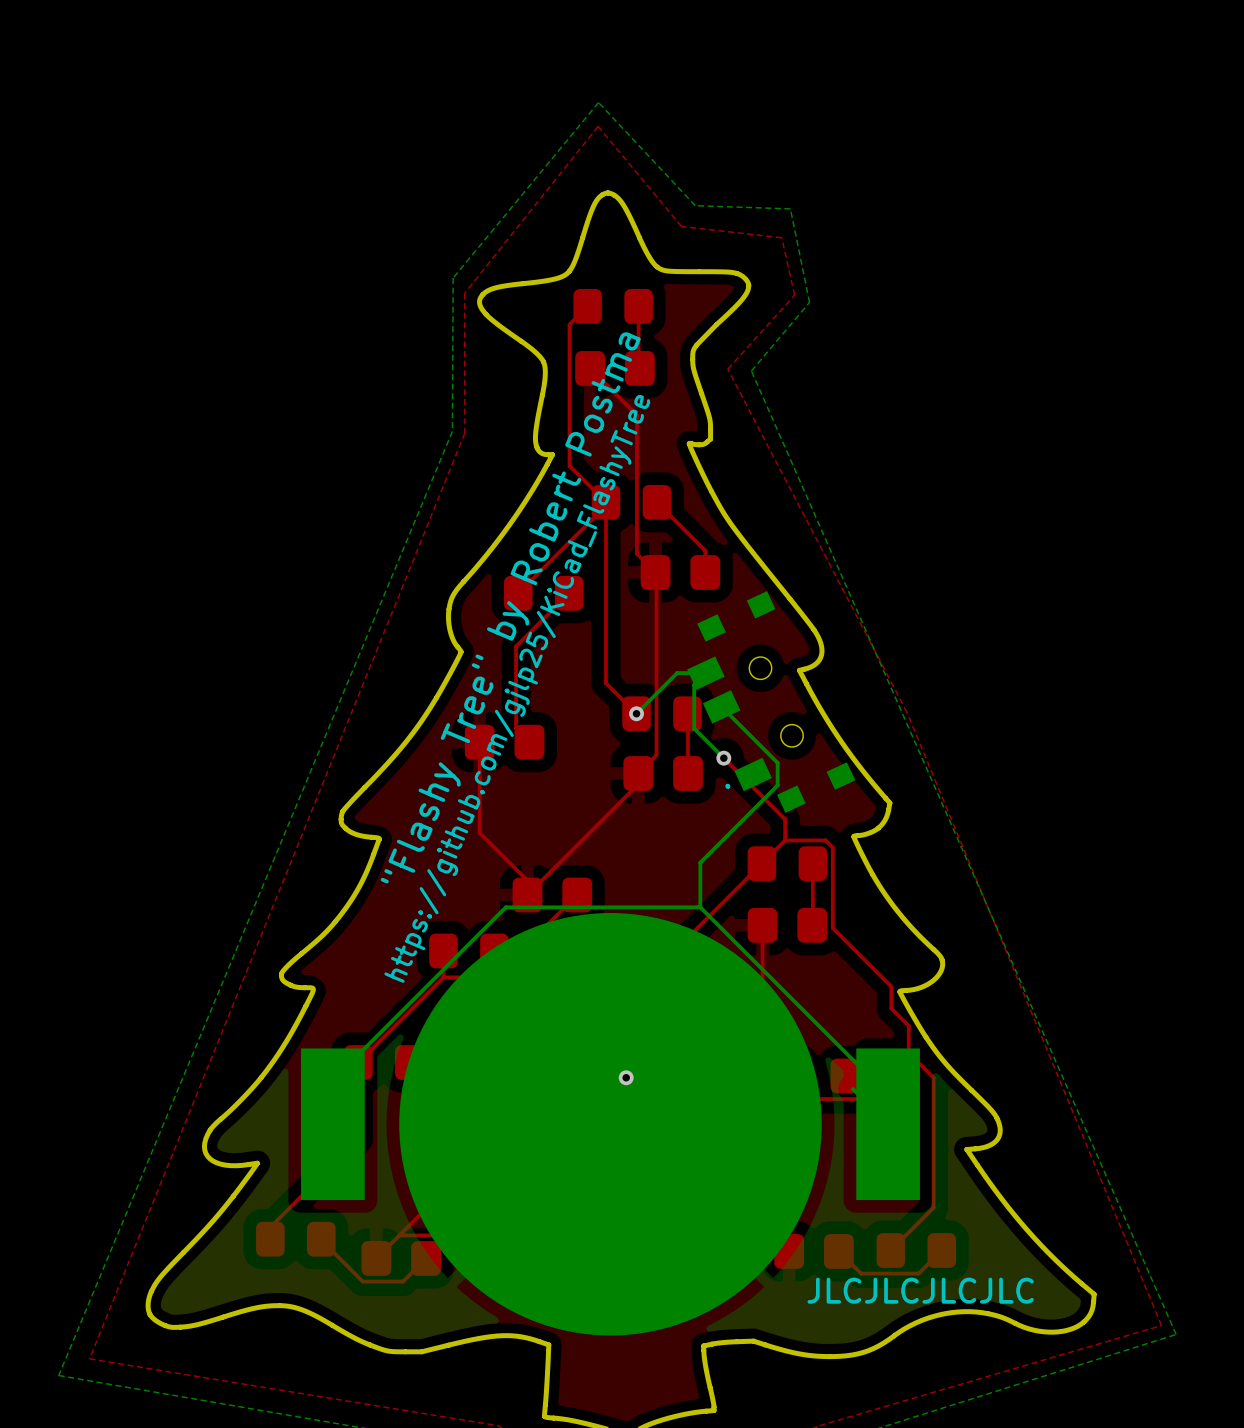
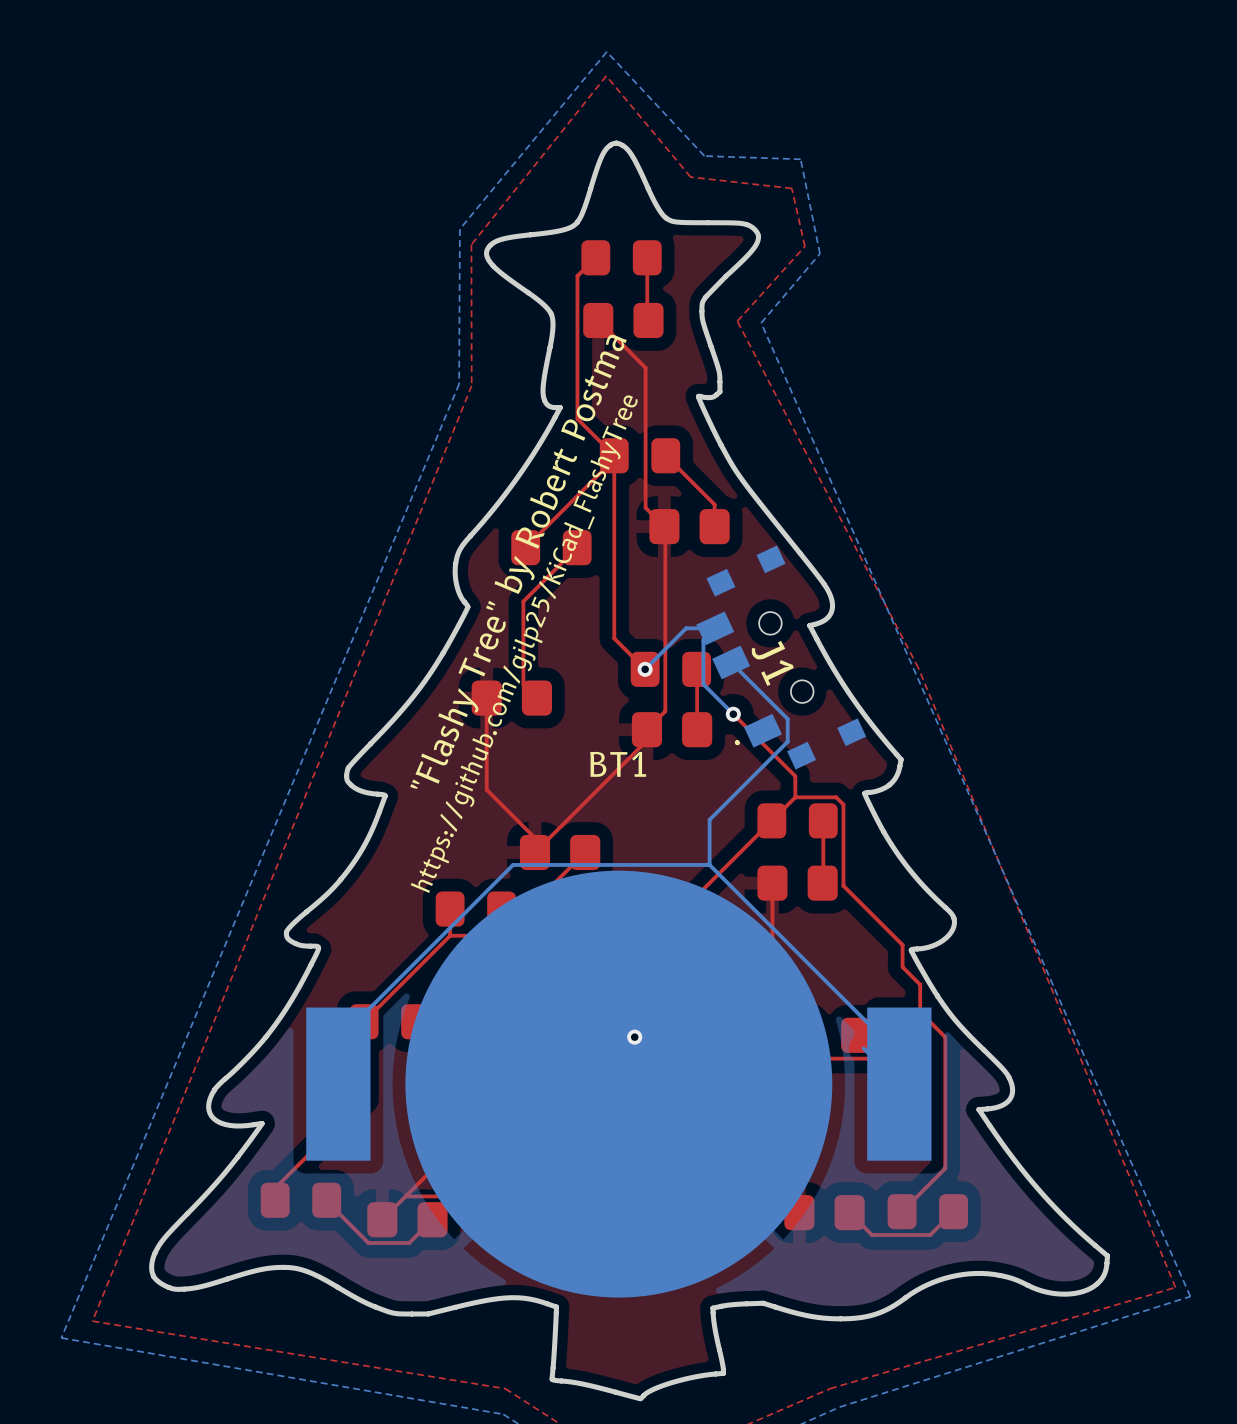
J1 name: none -> J1 (772, 663)
BT1 name: none -> BT1 (618, 764)
text: JLCJLCJLCJLC (920, 1290) -> none

